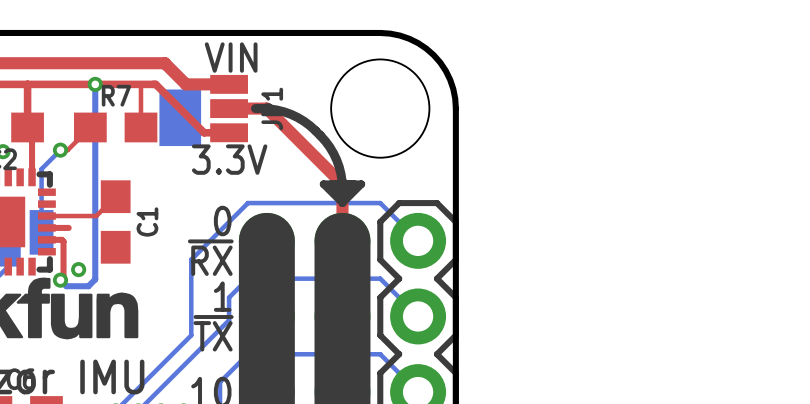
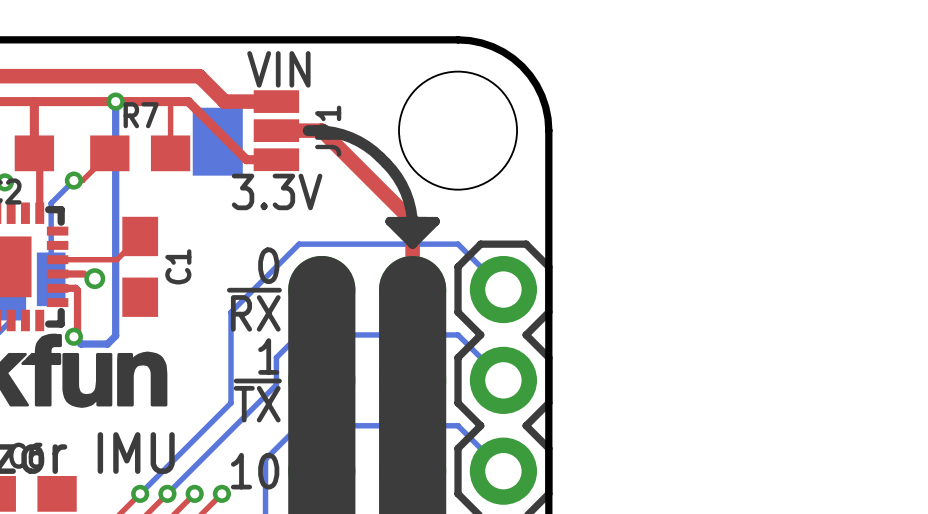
via: none -> (94, 278)
via: (78, 269) -> none

